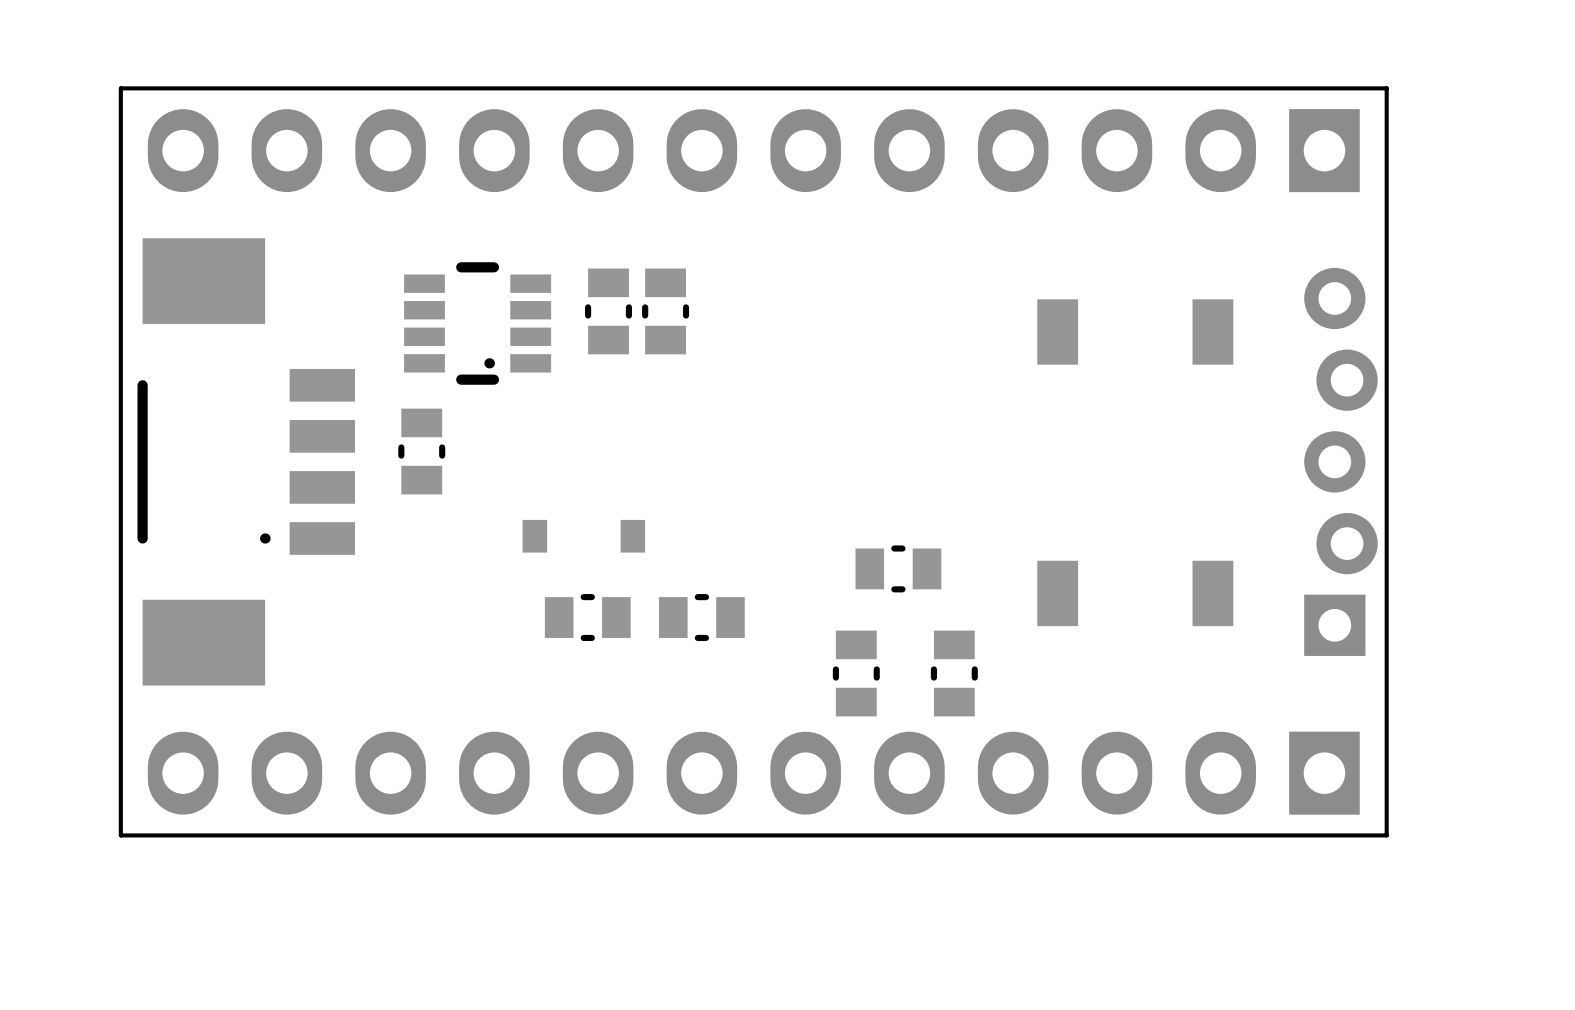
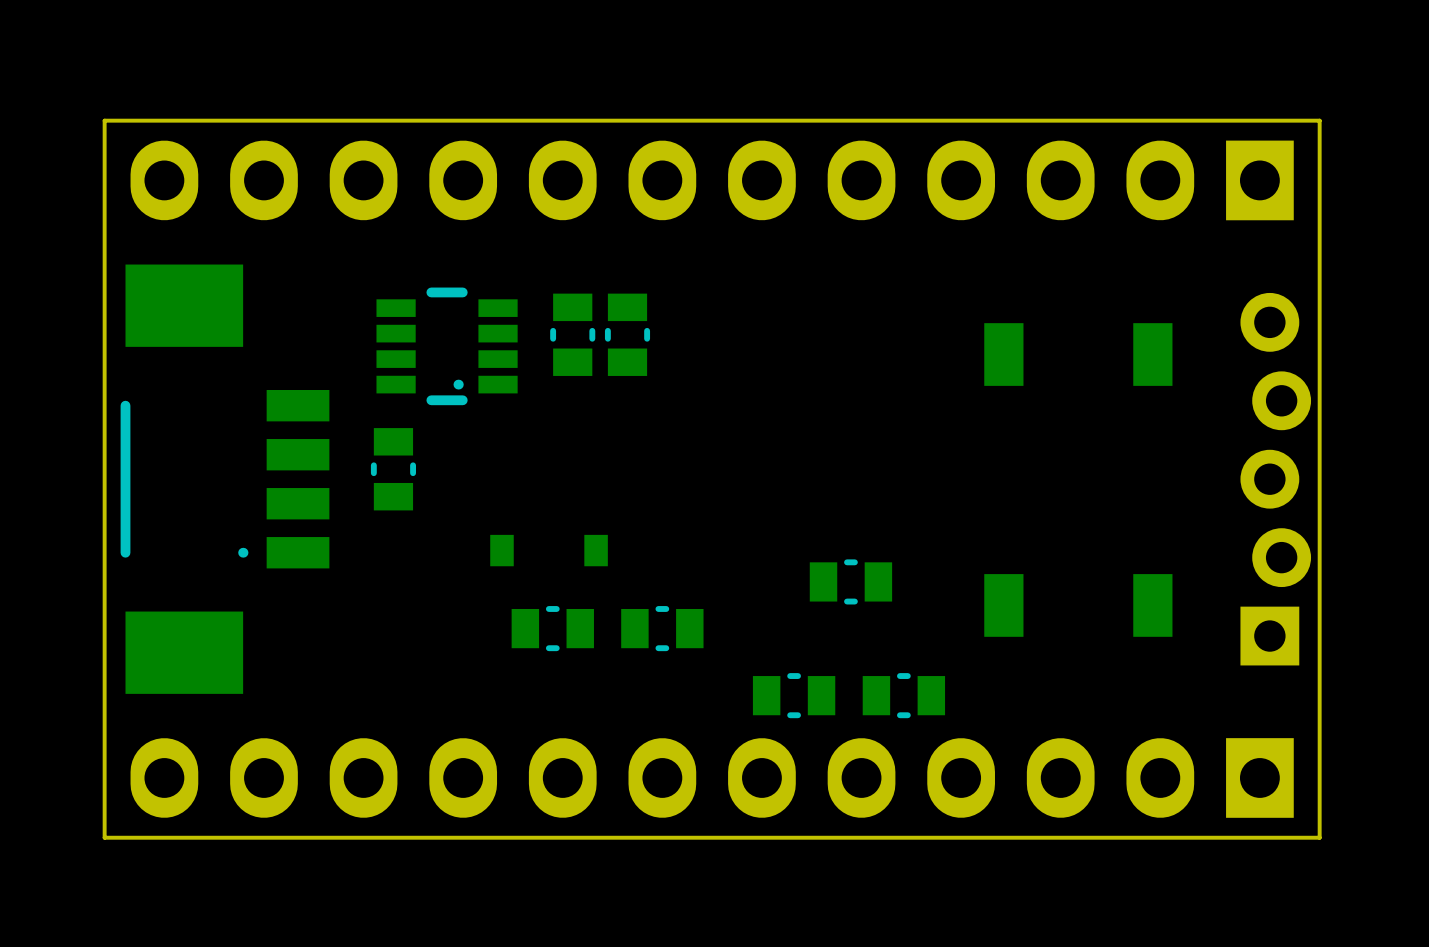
part rotation: 0° (856, 673) -> 90° clockwise (794, 695)
part rotation: 0° (954, 673) -> 90° clockwise (903, 695)

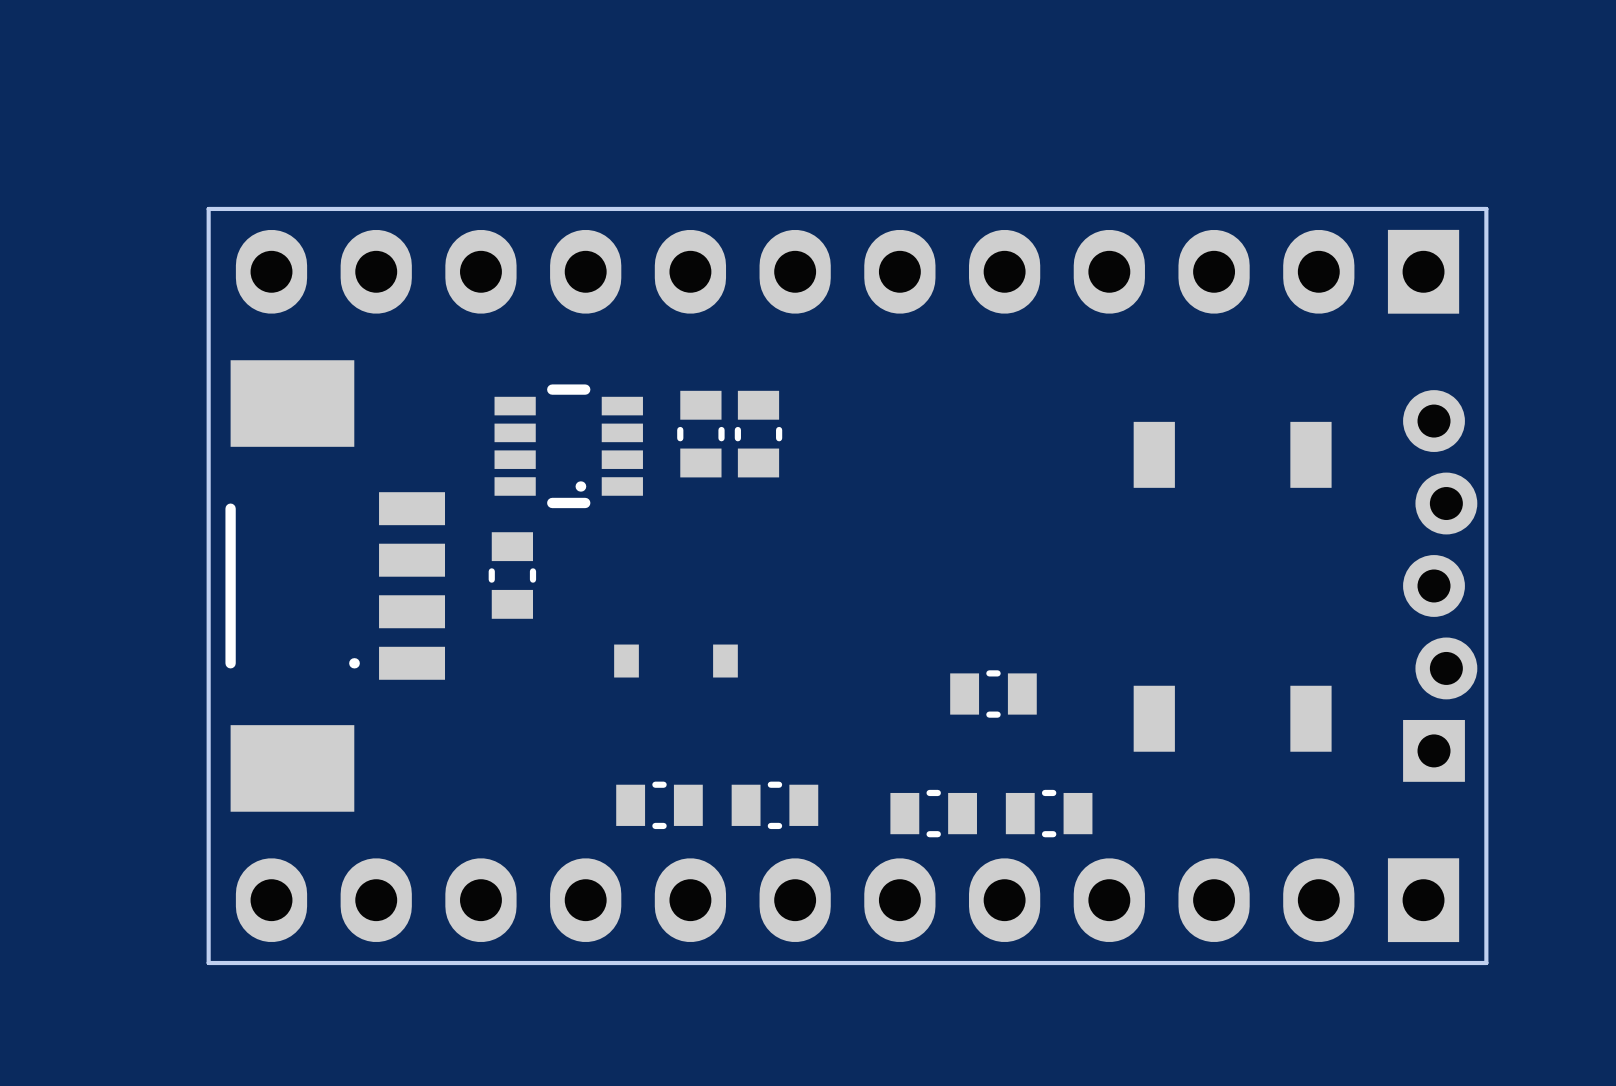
part: (552, 628) -> none
part: (662, 628) -> none
part: none -> (659, 805)
part: none -> (774, 805)

